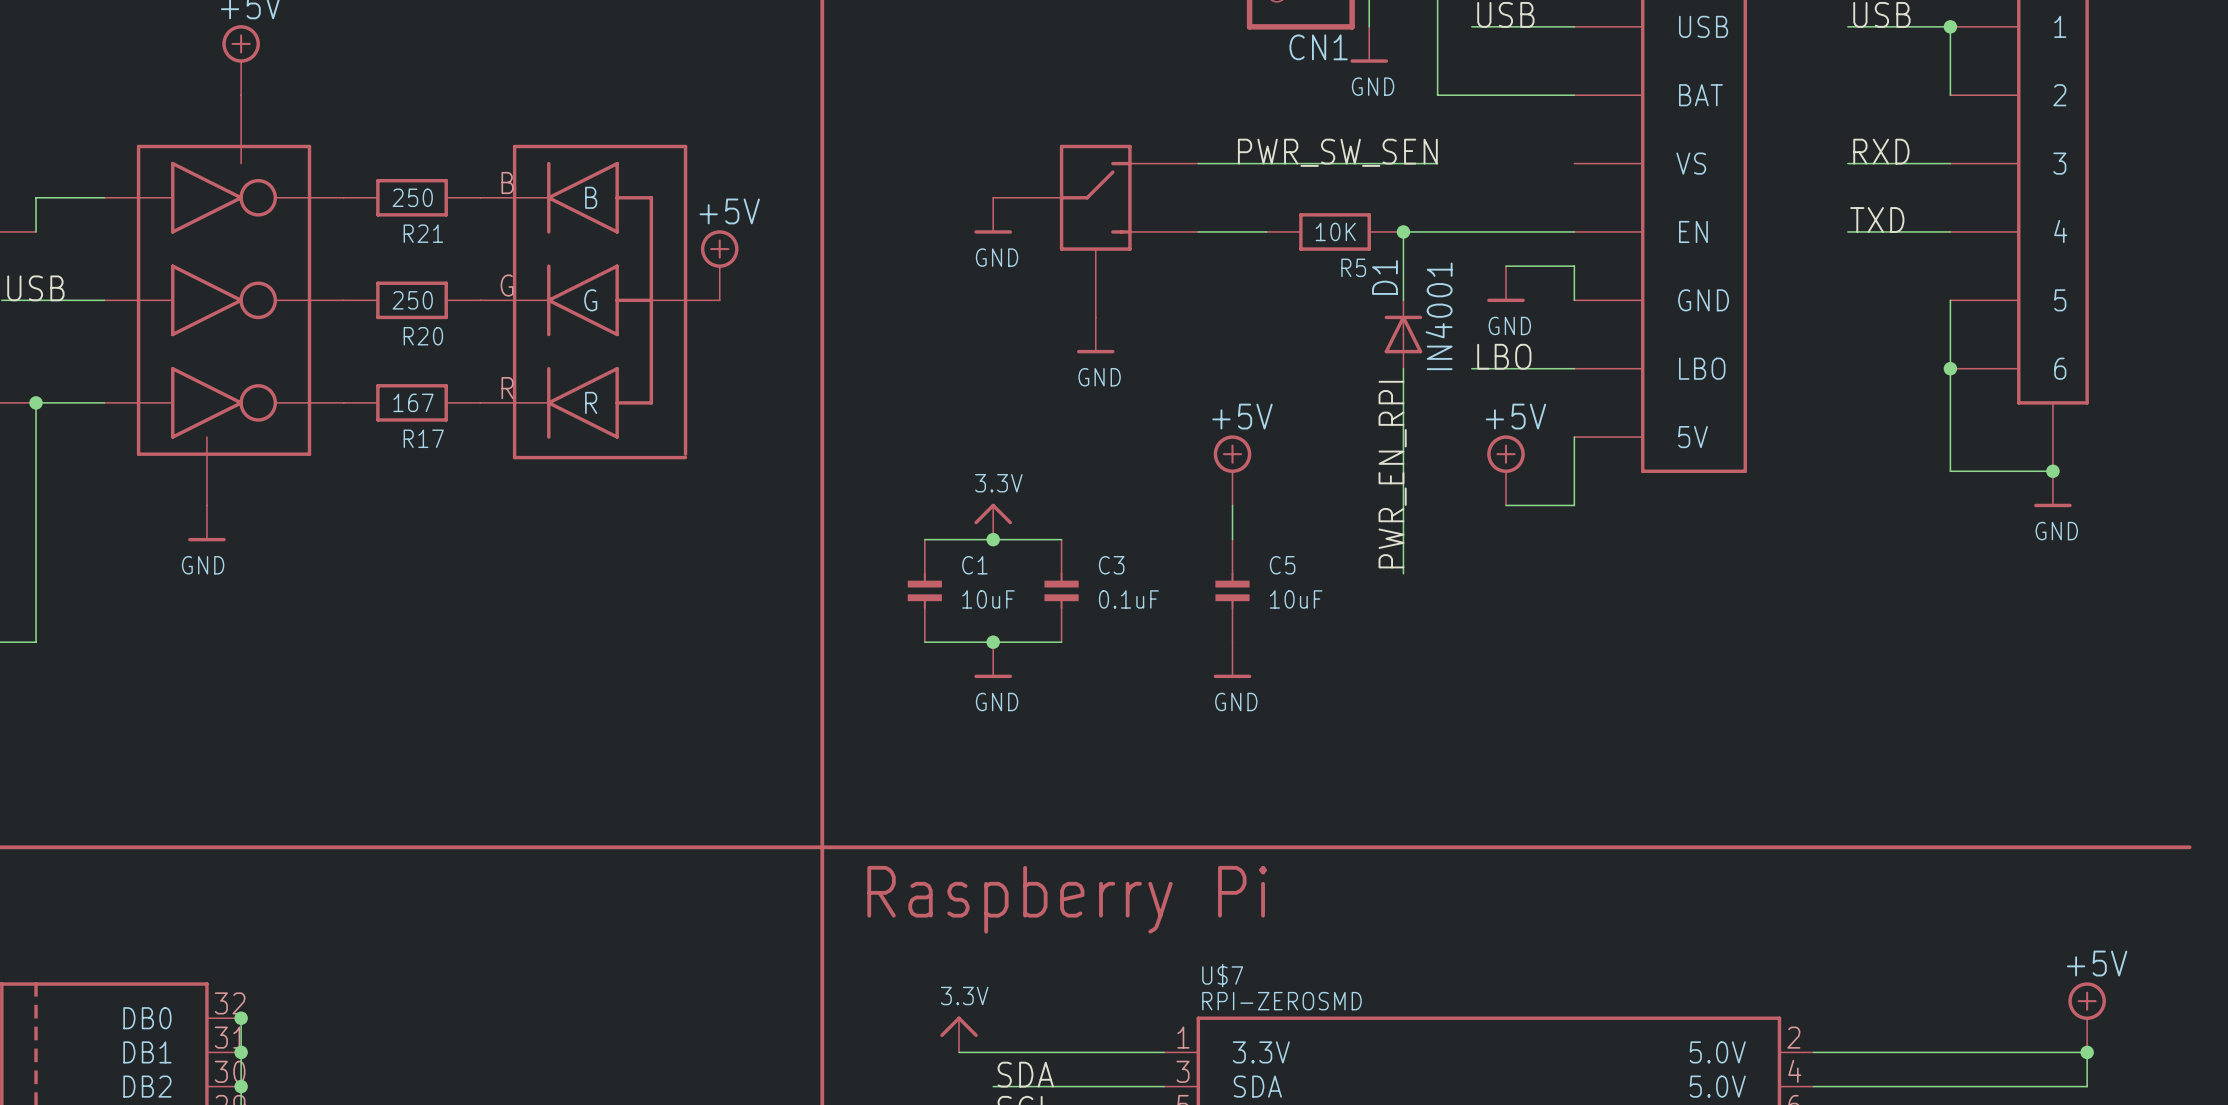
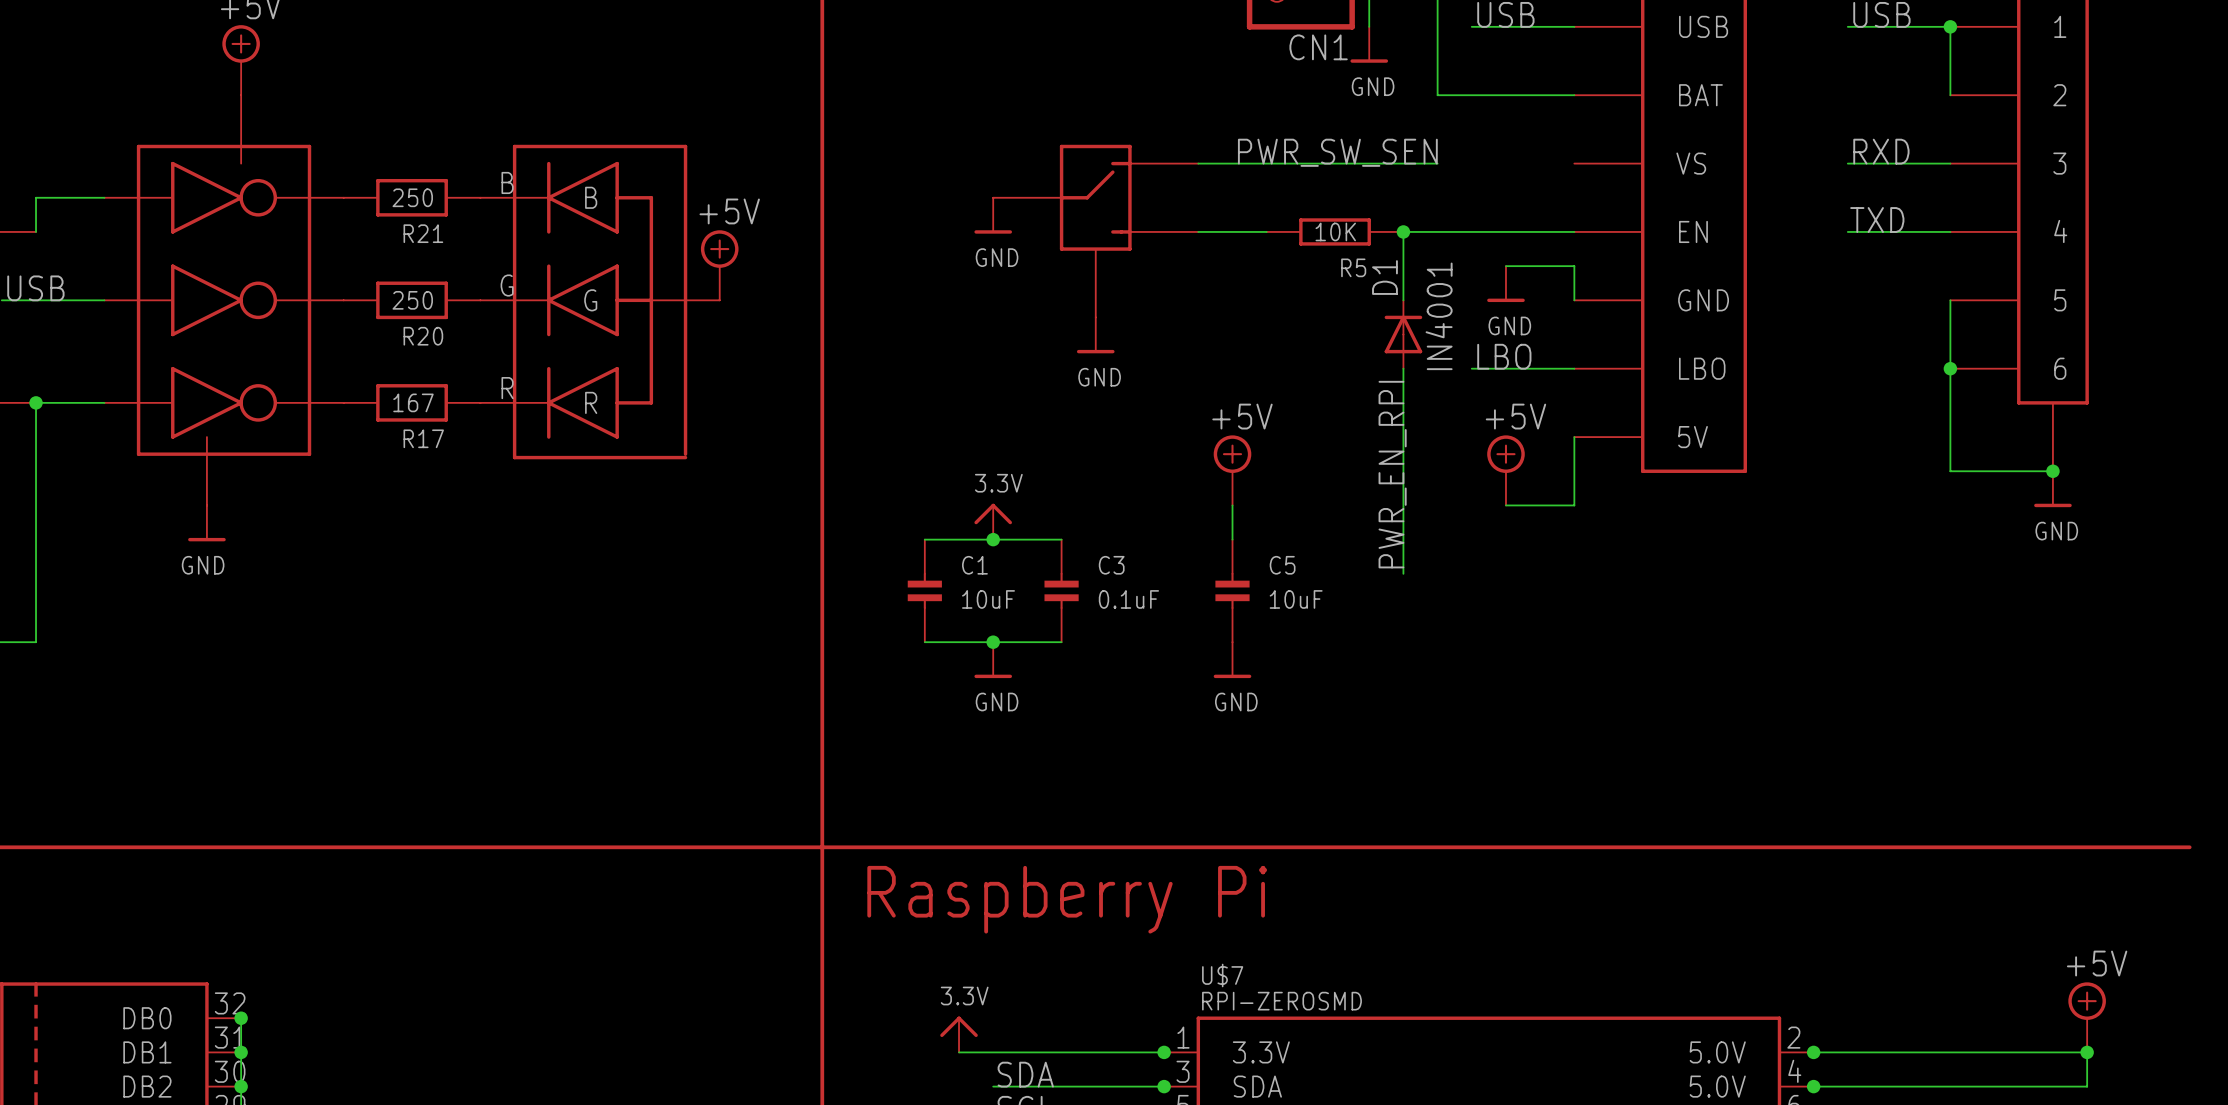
R5 symbol: [1266, 213, 1404, 251] -> [1266, 218, 1404, 246]
junction: none -> (1164, 1052)
junction: none -> (1813, 1052)
junction: none -> (1164, 1086)
junction: none -> (1813, 1086)

